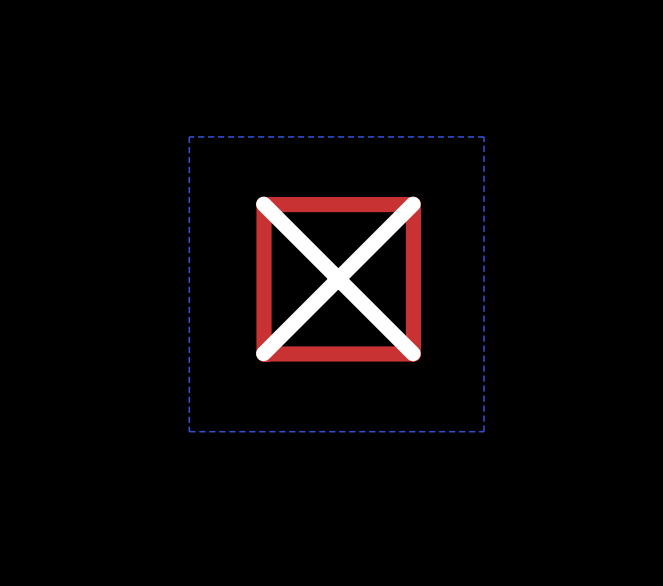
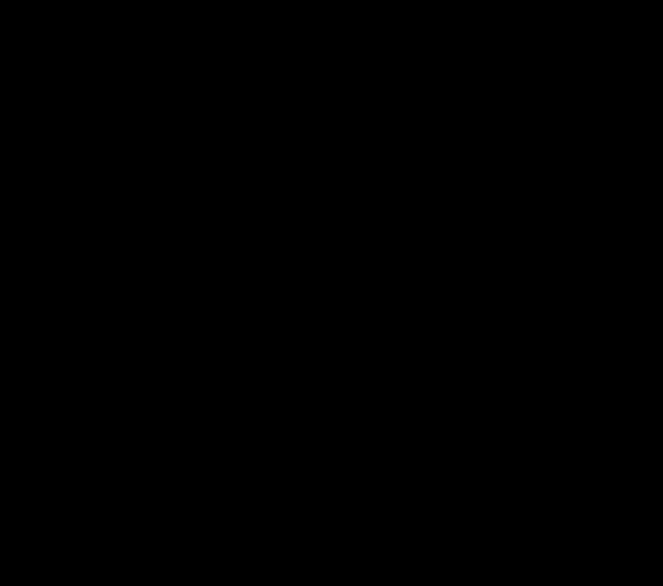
bottom zone outline: (484, 136) (189, 136) (189, 431) (484, 431) (484, 136) -> none
board edge: (263, 204) (413, 353) -> none
board edge: (413, 204) (263, 353) -> none
top track: (413, 204) (413, 353) (264, 353) (264, 204) (413, 204) -> none

